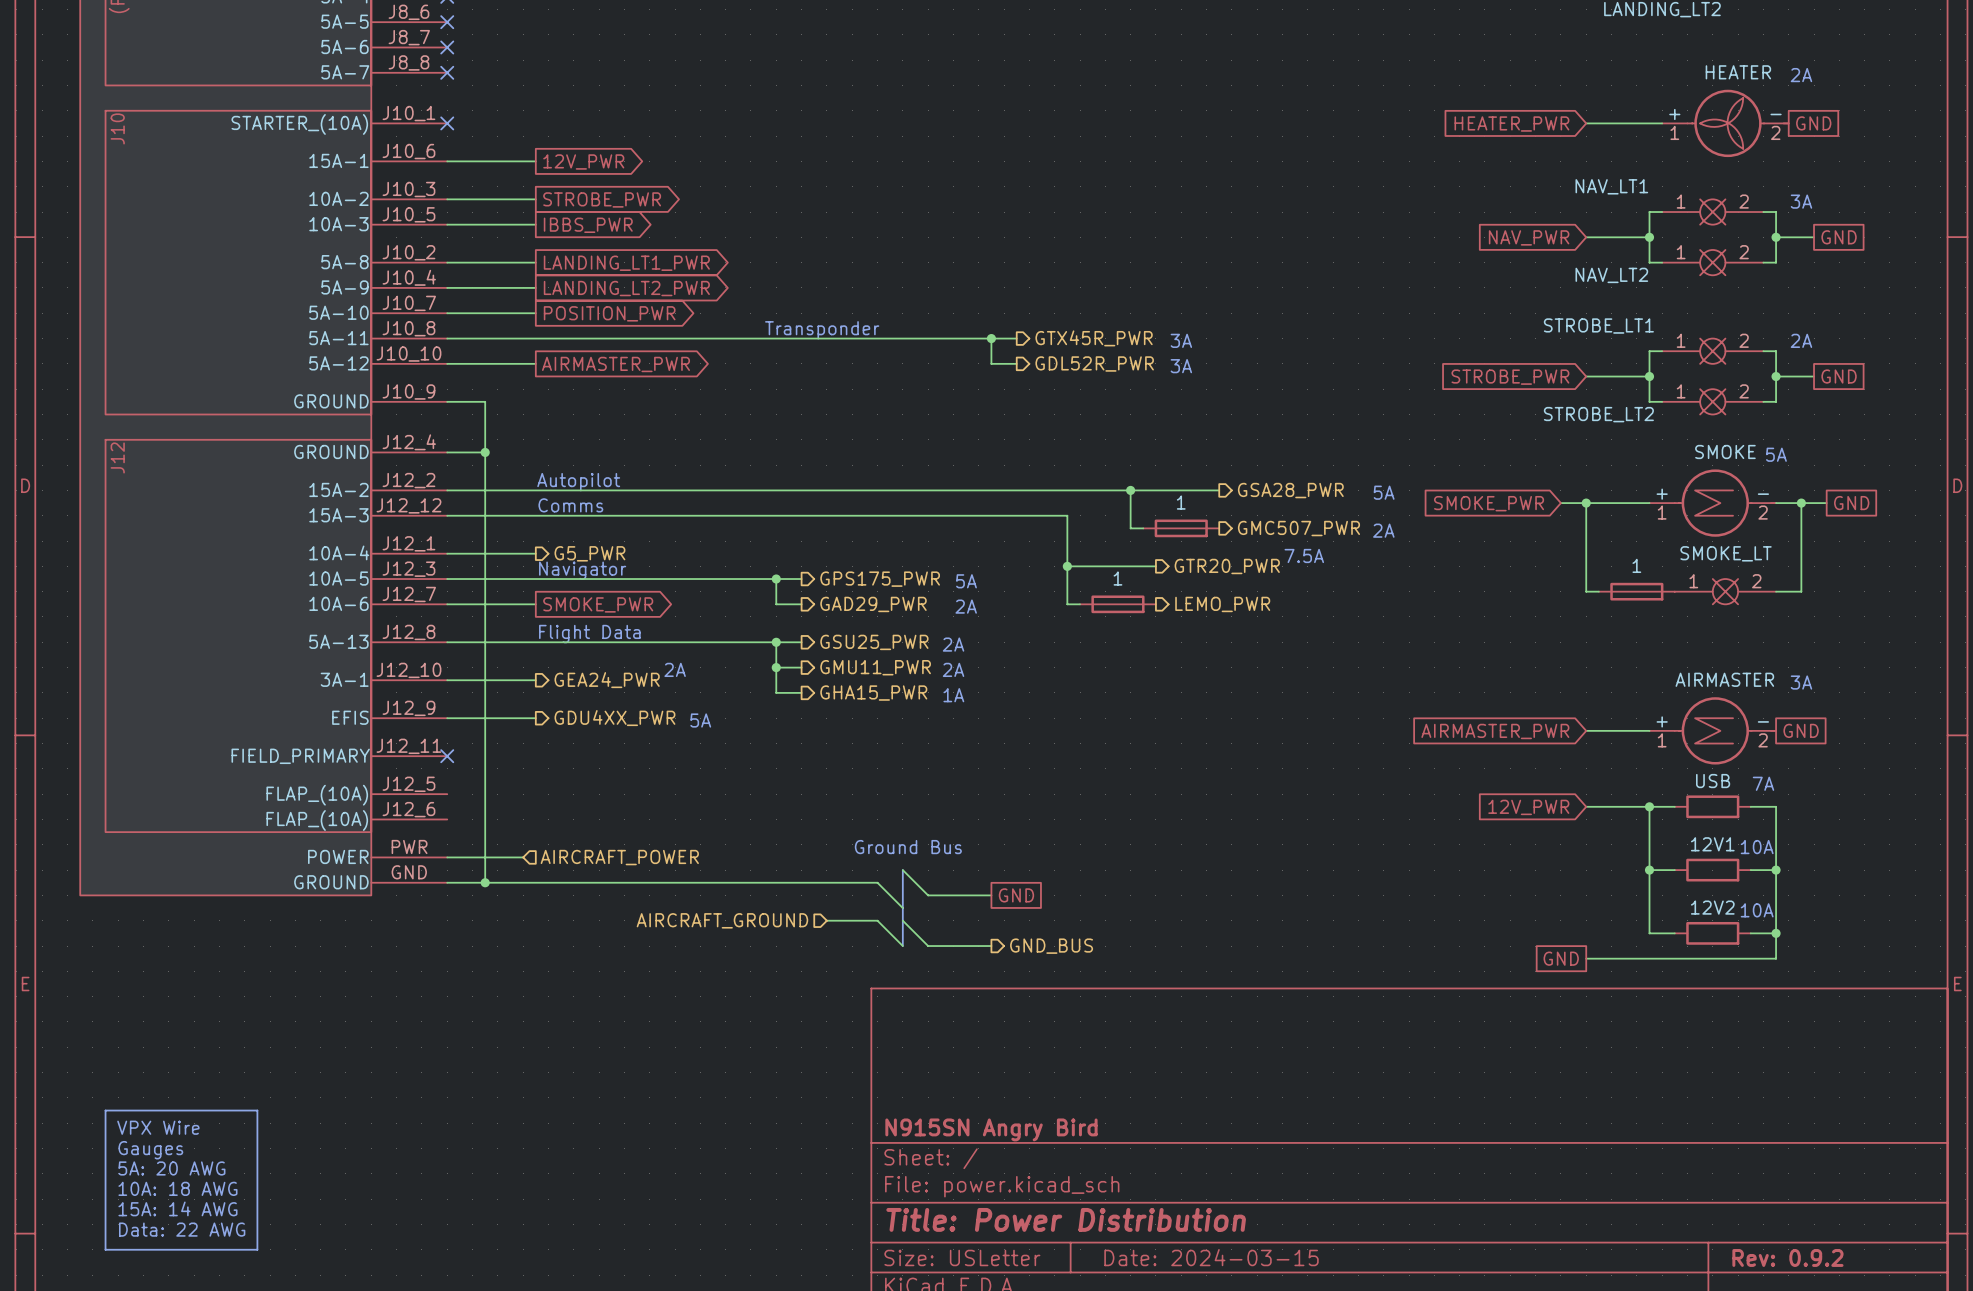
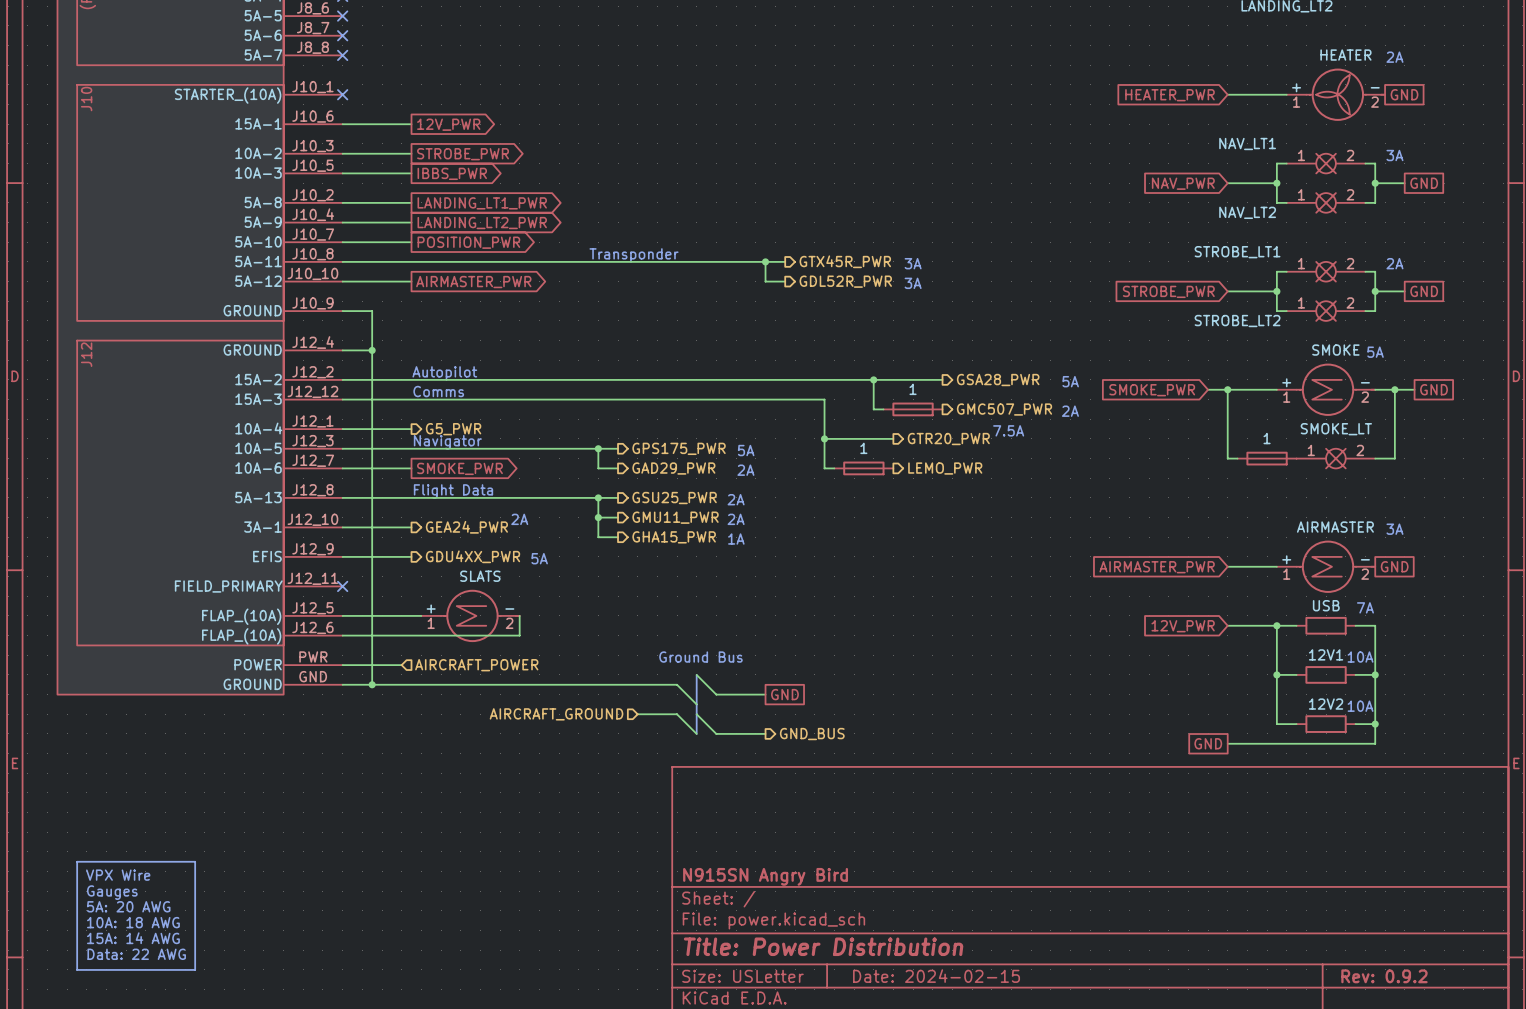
wire: none -> (342, 615) (421, 615)
SLATS: none -> (470, 615)
wire: none -> (519, 615) (519, 635) (342, 635)
title block: Date: 2024-03-15 (1211, 1257) -> Date: 2024-02-15 (936, 976)

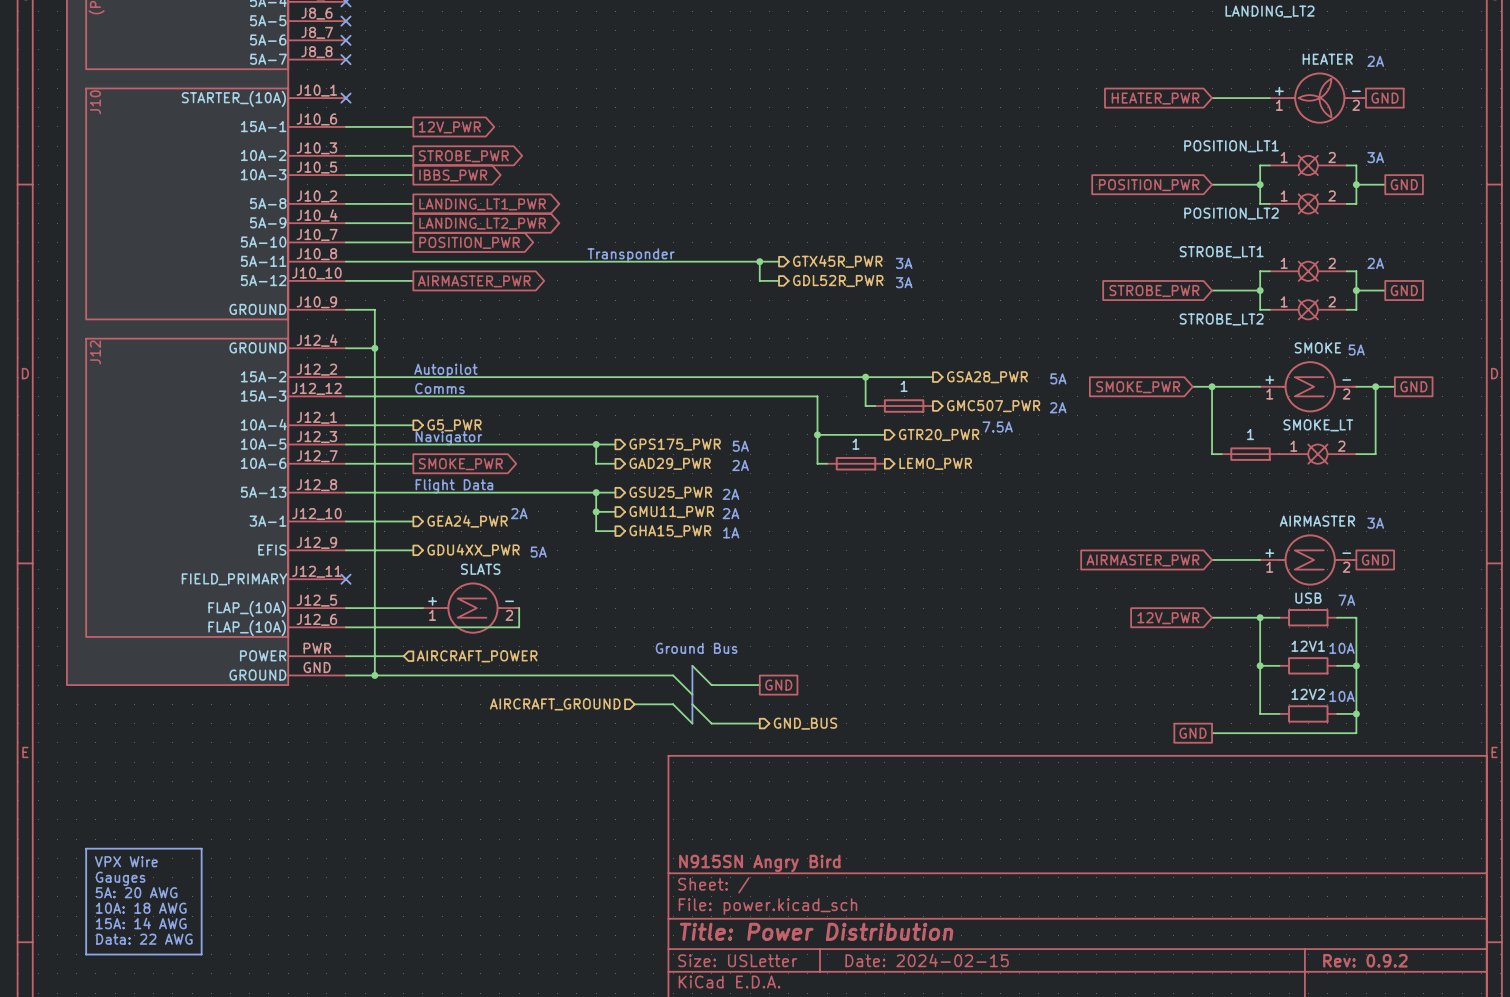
NAV_LT1 name: NAV_LT1 (1247, 144) -> POSITION_LT1 (1231, 146)
global label: NAV_PWR (1183, 183) -> POSITION_PWR (1149, 185)
NAV_LT2 name: NAV_LT2 (1247, 212) -> POSITION_LT2 (1231, 213)

